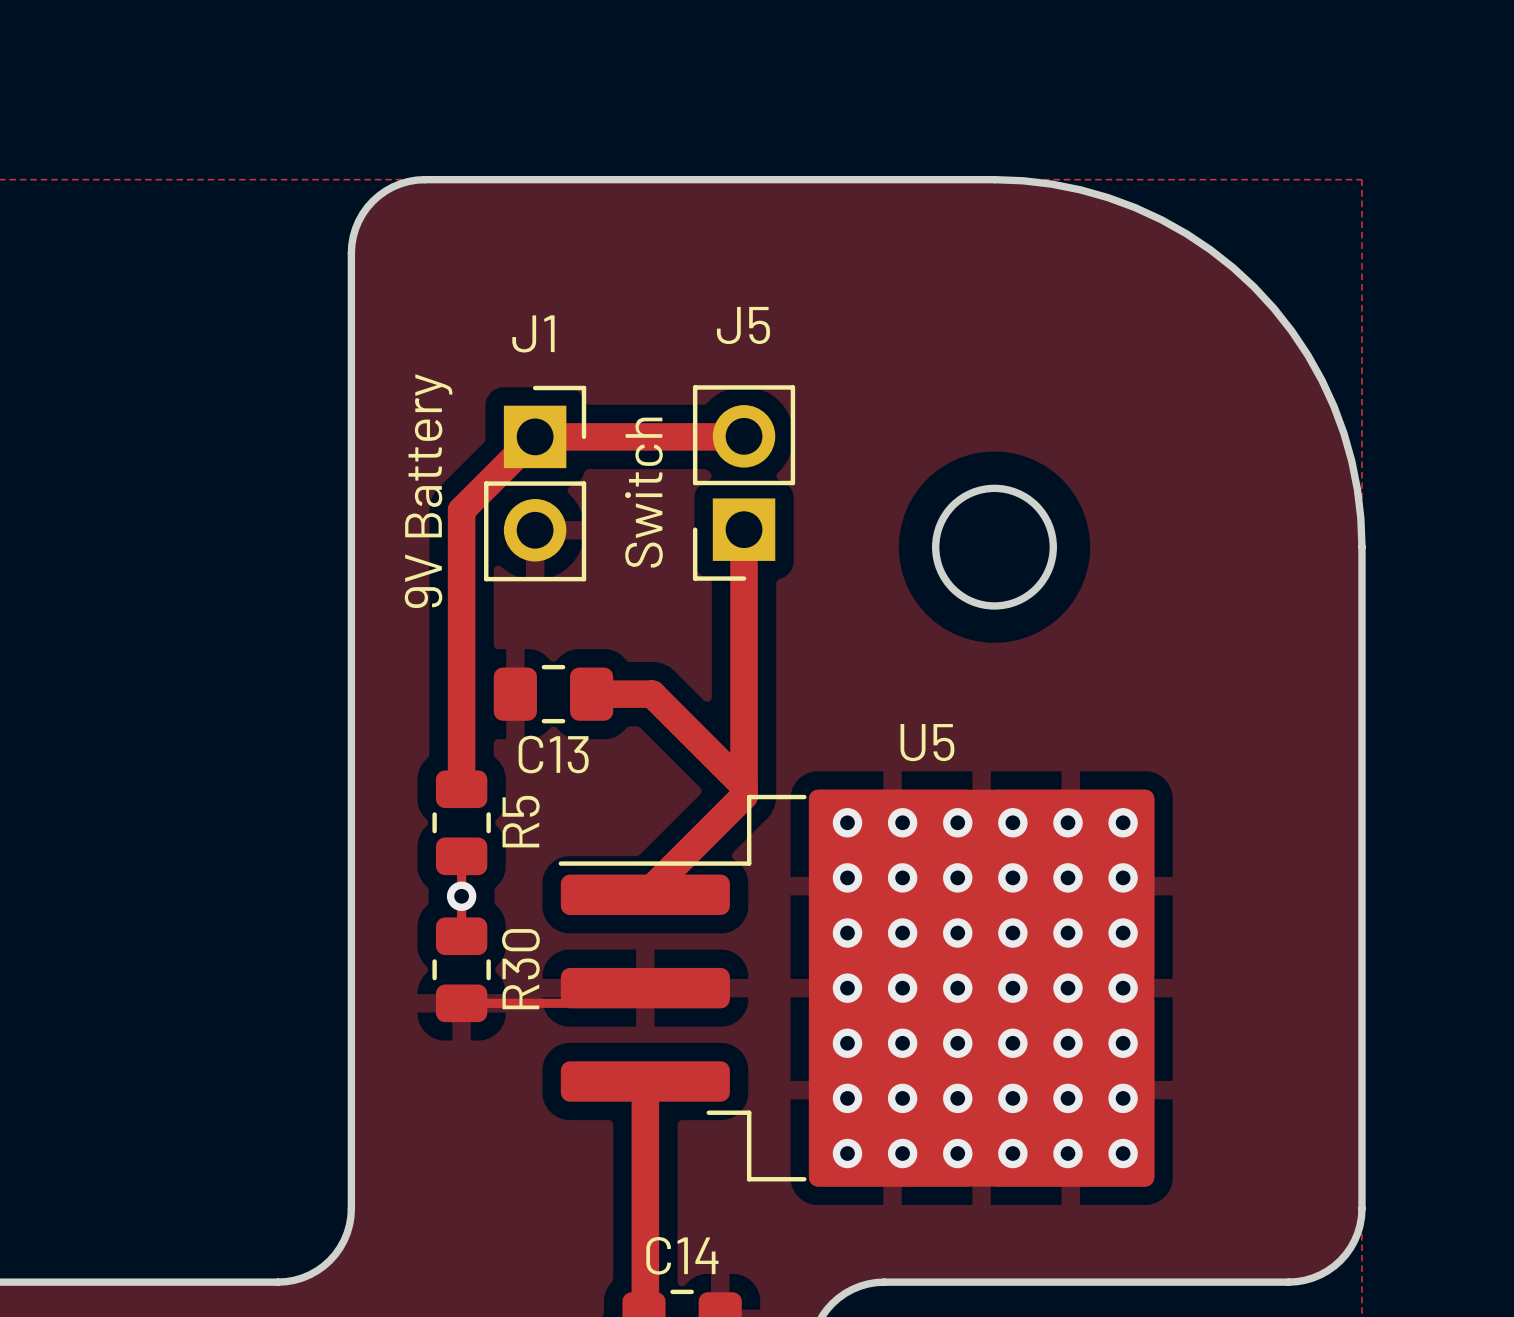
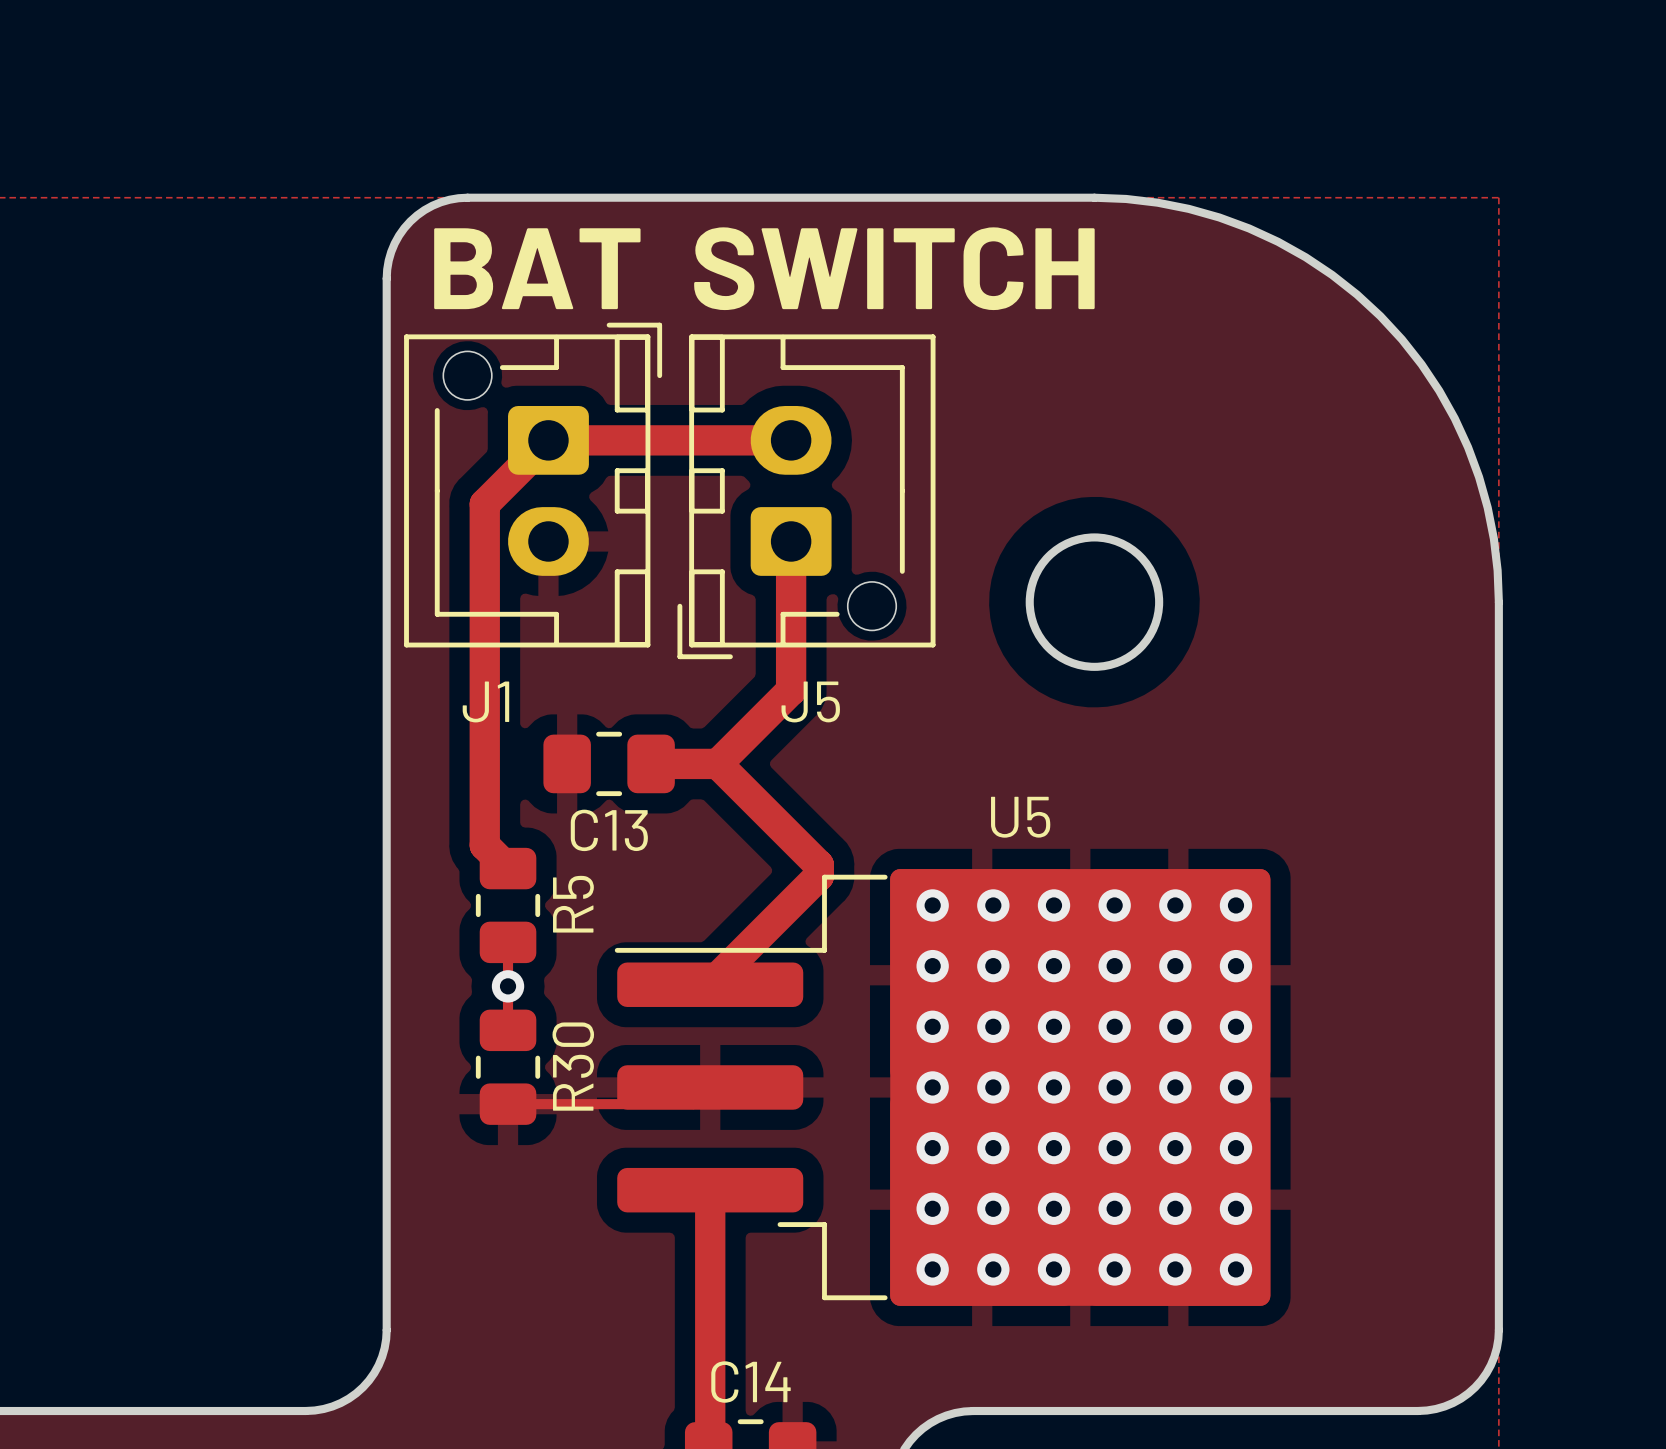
text: none -> BAT (537, 268)
text: none -> SWITCH (894, 268)
J5 name position: J5 (743, 325) -> J5 (810, 701)
J1 name position: J1 (533, 333) -> J1 (485, 701)
J1 footprint: [484, 385, 587, 582] -> [404, 322, 663, 648]
J5 footprint: [692, 385, 796, 581] -> [677, 334, 936, 660]
track: (744, 436) (535, 436) (461, 510) (461, 789) -> (791, 440) (548, 440) (484, 504) (484, 845) (508, 868)
J1 value: 9V Battery (428, 491) -> none
J5 value: Switch (643, 492) -> none
track: none -> (791, 541) (791, 690) (717, 763)
track: (744, 529) (744, 786) -> none

